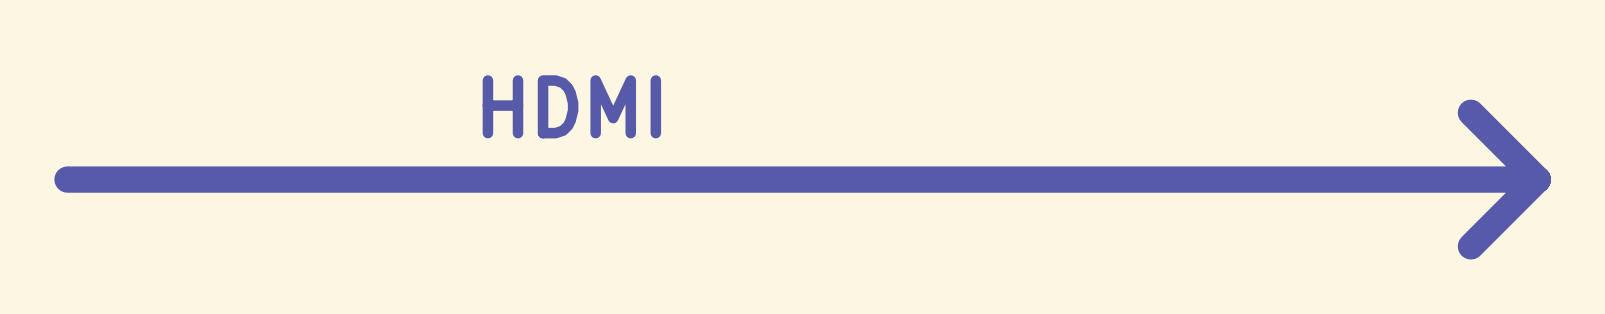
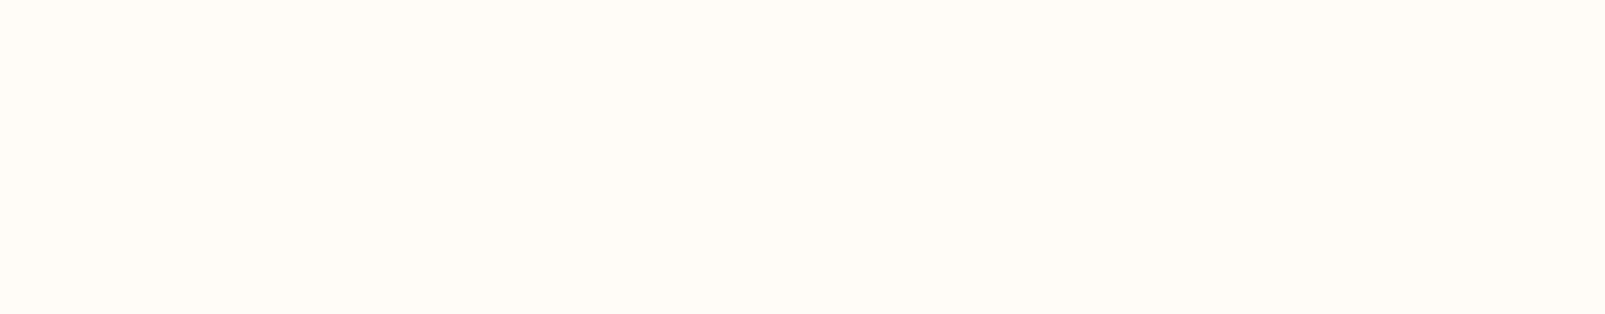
text: HDMI (571, 106) -> none
line: (1470, 112) (1537, 179) -> none
line: (67, 179) (1537, 179) -> none
line: (1537, 179) (1470, 246) -> none

